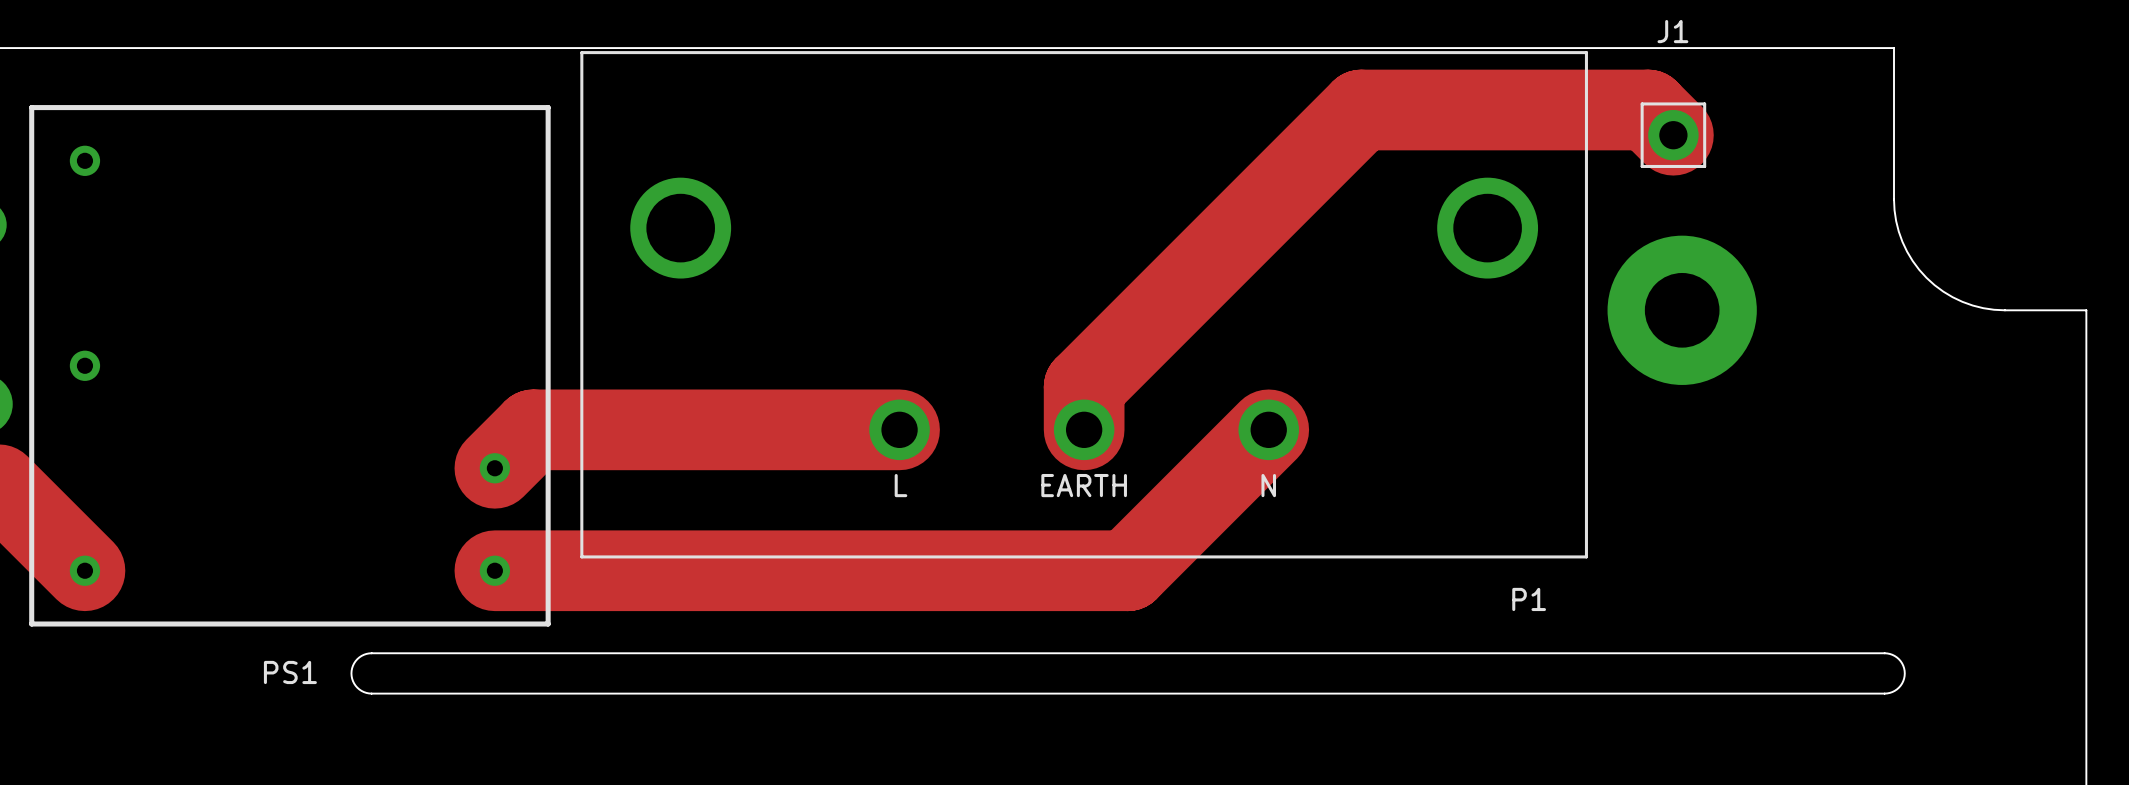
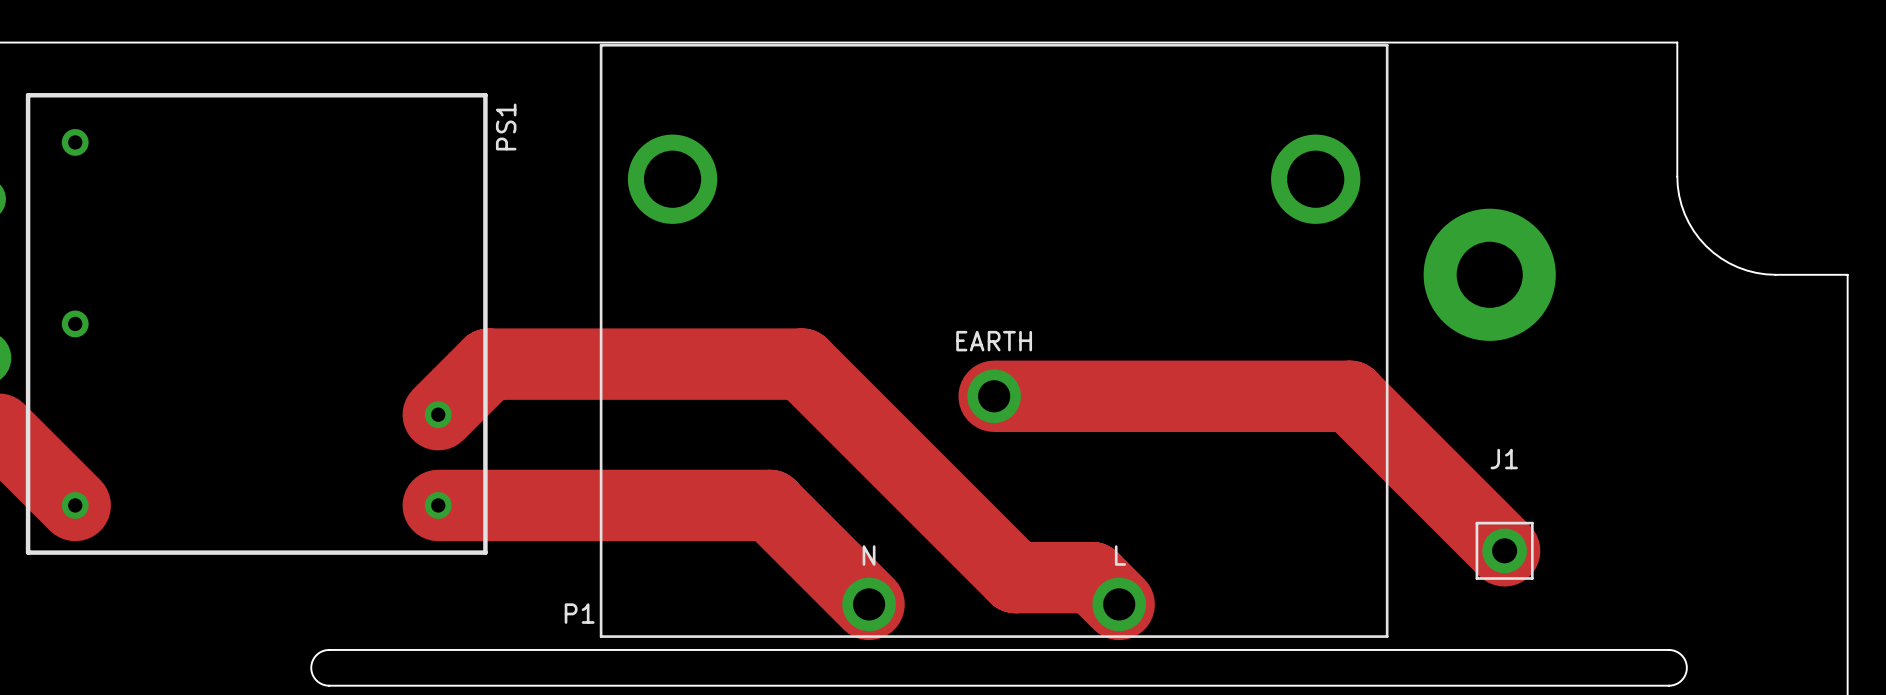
P1 footprint: [580, 51, 1588, 559] -> [599, 43, 1389, 638]
track: (1673, 135) (1648, 109) (1361, 109) (1084, 387) (1084, 429) -> none
J1 position: (1673, 135) -> (1504, 550)
track: (533, 429) (899, 429) -> (472, 380) (488, 364) (802, 364) (1015, 577) (1092, 577) (1119, 604)
track: (1268, 429) (1127, 570) (869, 570) -> (869, 604) (770, 505)
track: none -> (994, 396) (1350, 396) (1504, 550)
P1 name position: P1 (1529, 599) -> P1 (579, 613)
board edge: (371, 653) (1884, 653) (1892, 654) (1898, 659) (1903, 665) (1904, 673) (1903, 681) (1898, 687) (1892, 692) (1884, 693) (371, 693) (363, 692) (357, 687) (352, 681) (351, 673) (352, 665) (357, 659) (363, 654) (371, 653) -> (329, 649) (1668, 649) (1681, 655) (1686, 667) (1681, 680) (1668, 685) (329, 685) (316, 680) (311, 667) (316, 655) (329, 649)
PS1 name rotation: 0° (290, 672) -> 90° counterclockwise (506, 126)
PS1 name position: PS1 (290, 672) -> PS1 (506, 126)

